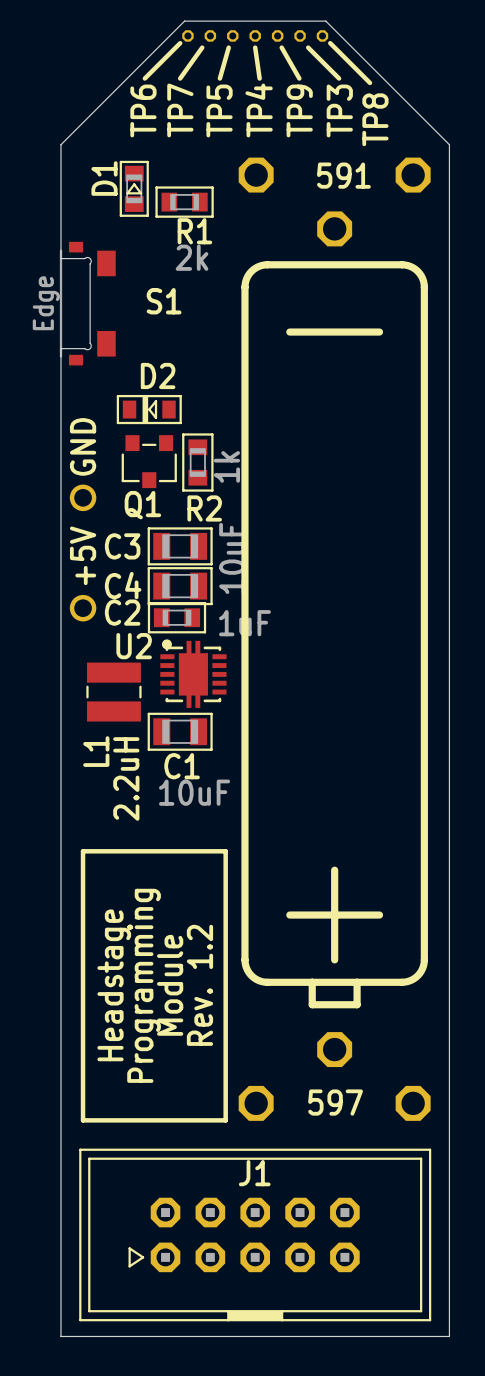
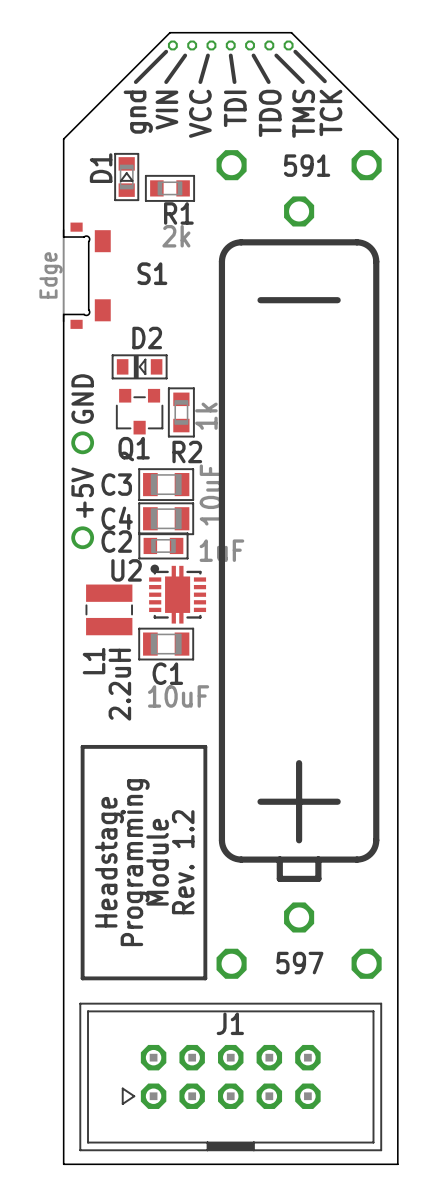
line: (364, 77) (369, 82) -> none
text: none -> TDI (235, 108)
TP6 name: TP6 (143, 110) -> none
TP7 name: TP7 (180, 110) -> none
TP5 name: TP5 (219, 110) -> none
TP4 name: TP4 (259, 110) -> none
TP9 name: TP9 (299, 110) -> none
TP3 name: TP3 (339, 110) -> none
text: none -> VIN (166, 110)
text: none -> gnd (138, 112)
text: none -> TDO (270, 113)
text: none -> TCK (330, 112)
text: none -> VCC (200, 113)
text: none -> TMS (303, 113)
TP8 name: TP8 (375, 119) -> none

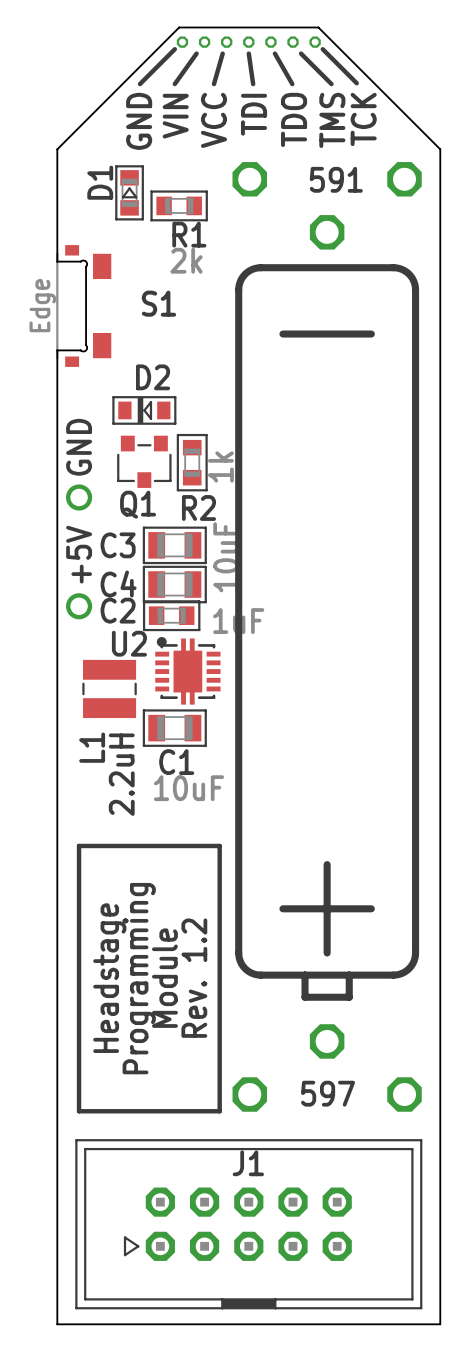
text: gnd (138, 112) -> GND (139, 121)

